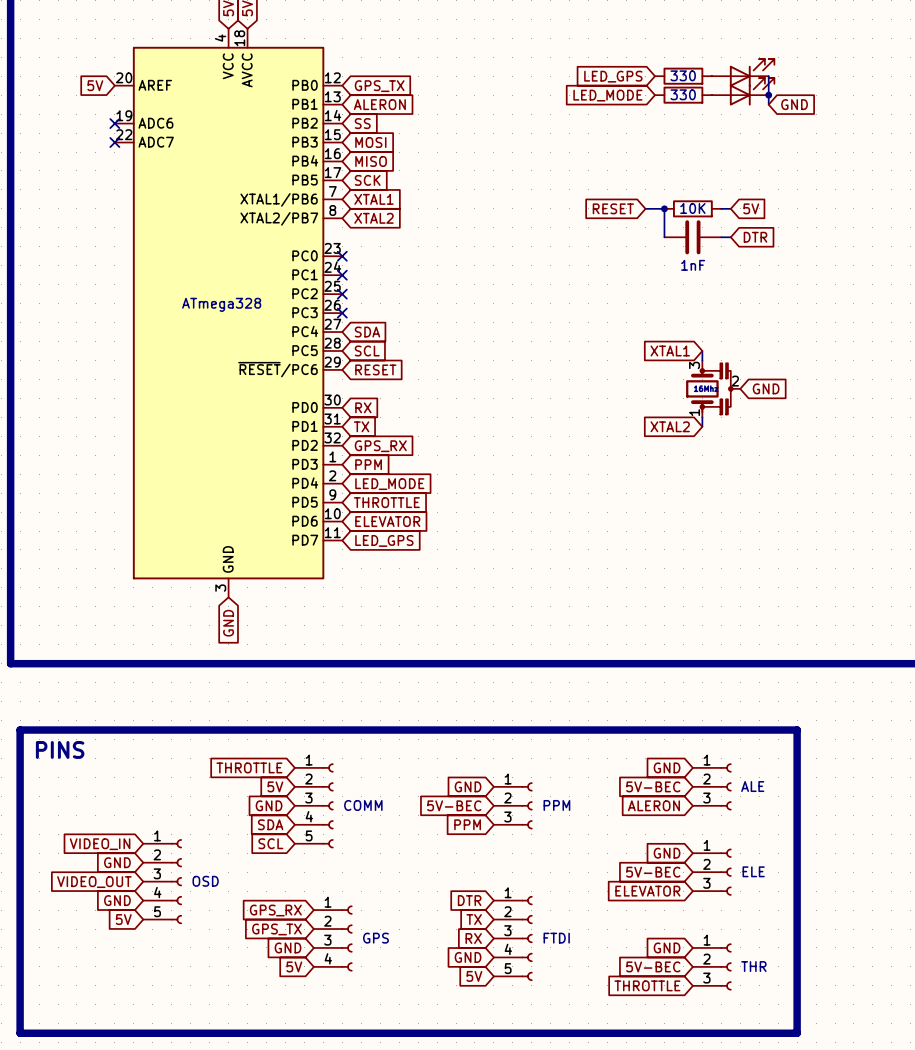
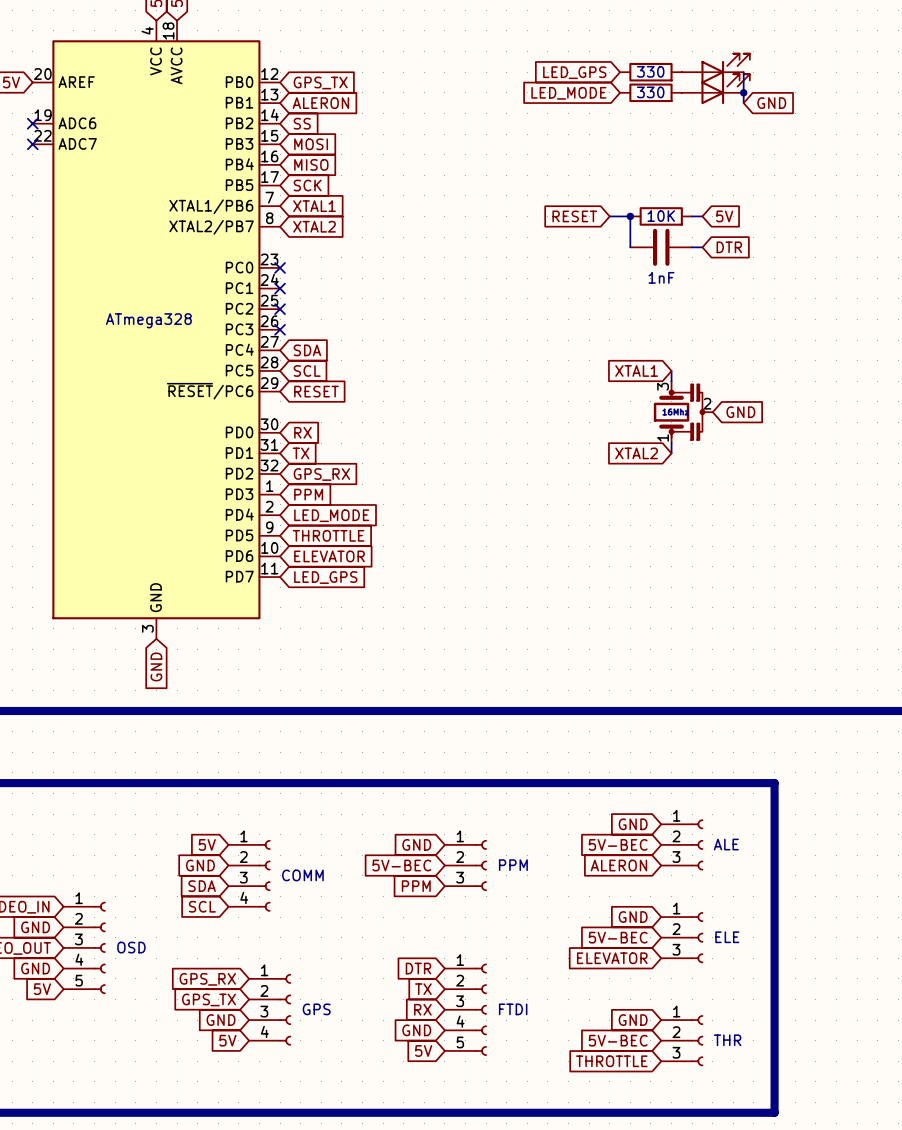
global label: THROTTLE (249, 767) -> none
part: COMM (314, 805) -> none
part: none -> COMM (249, 875)

